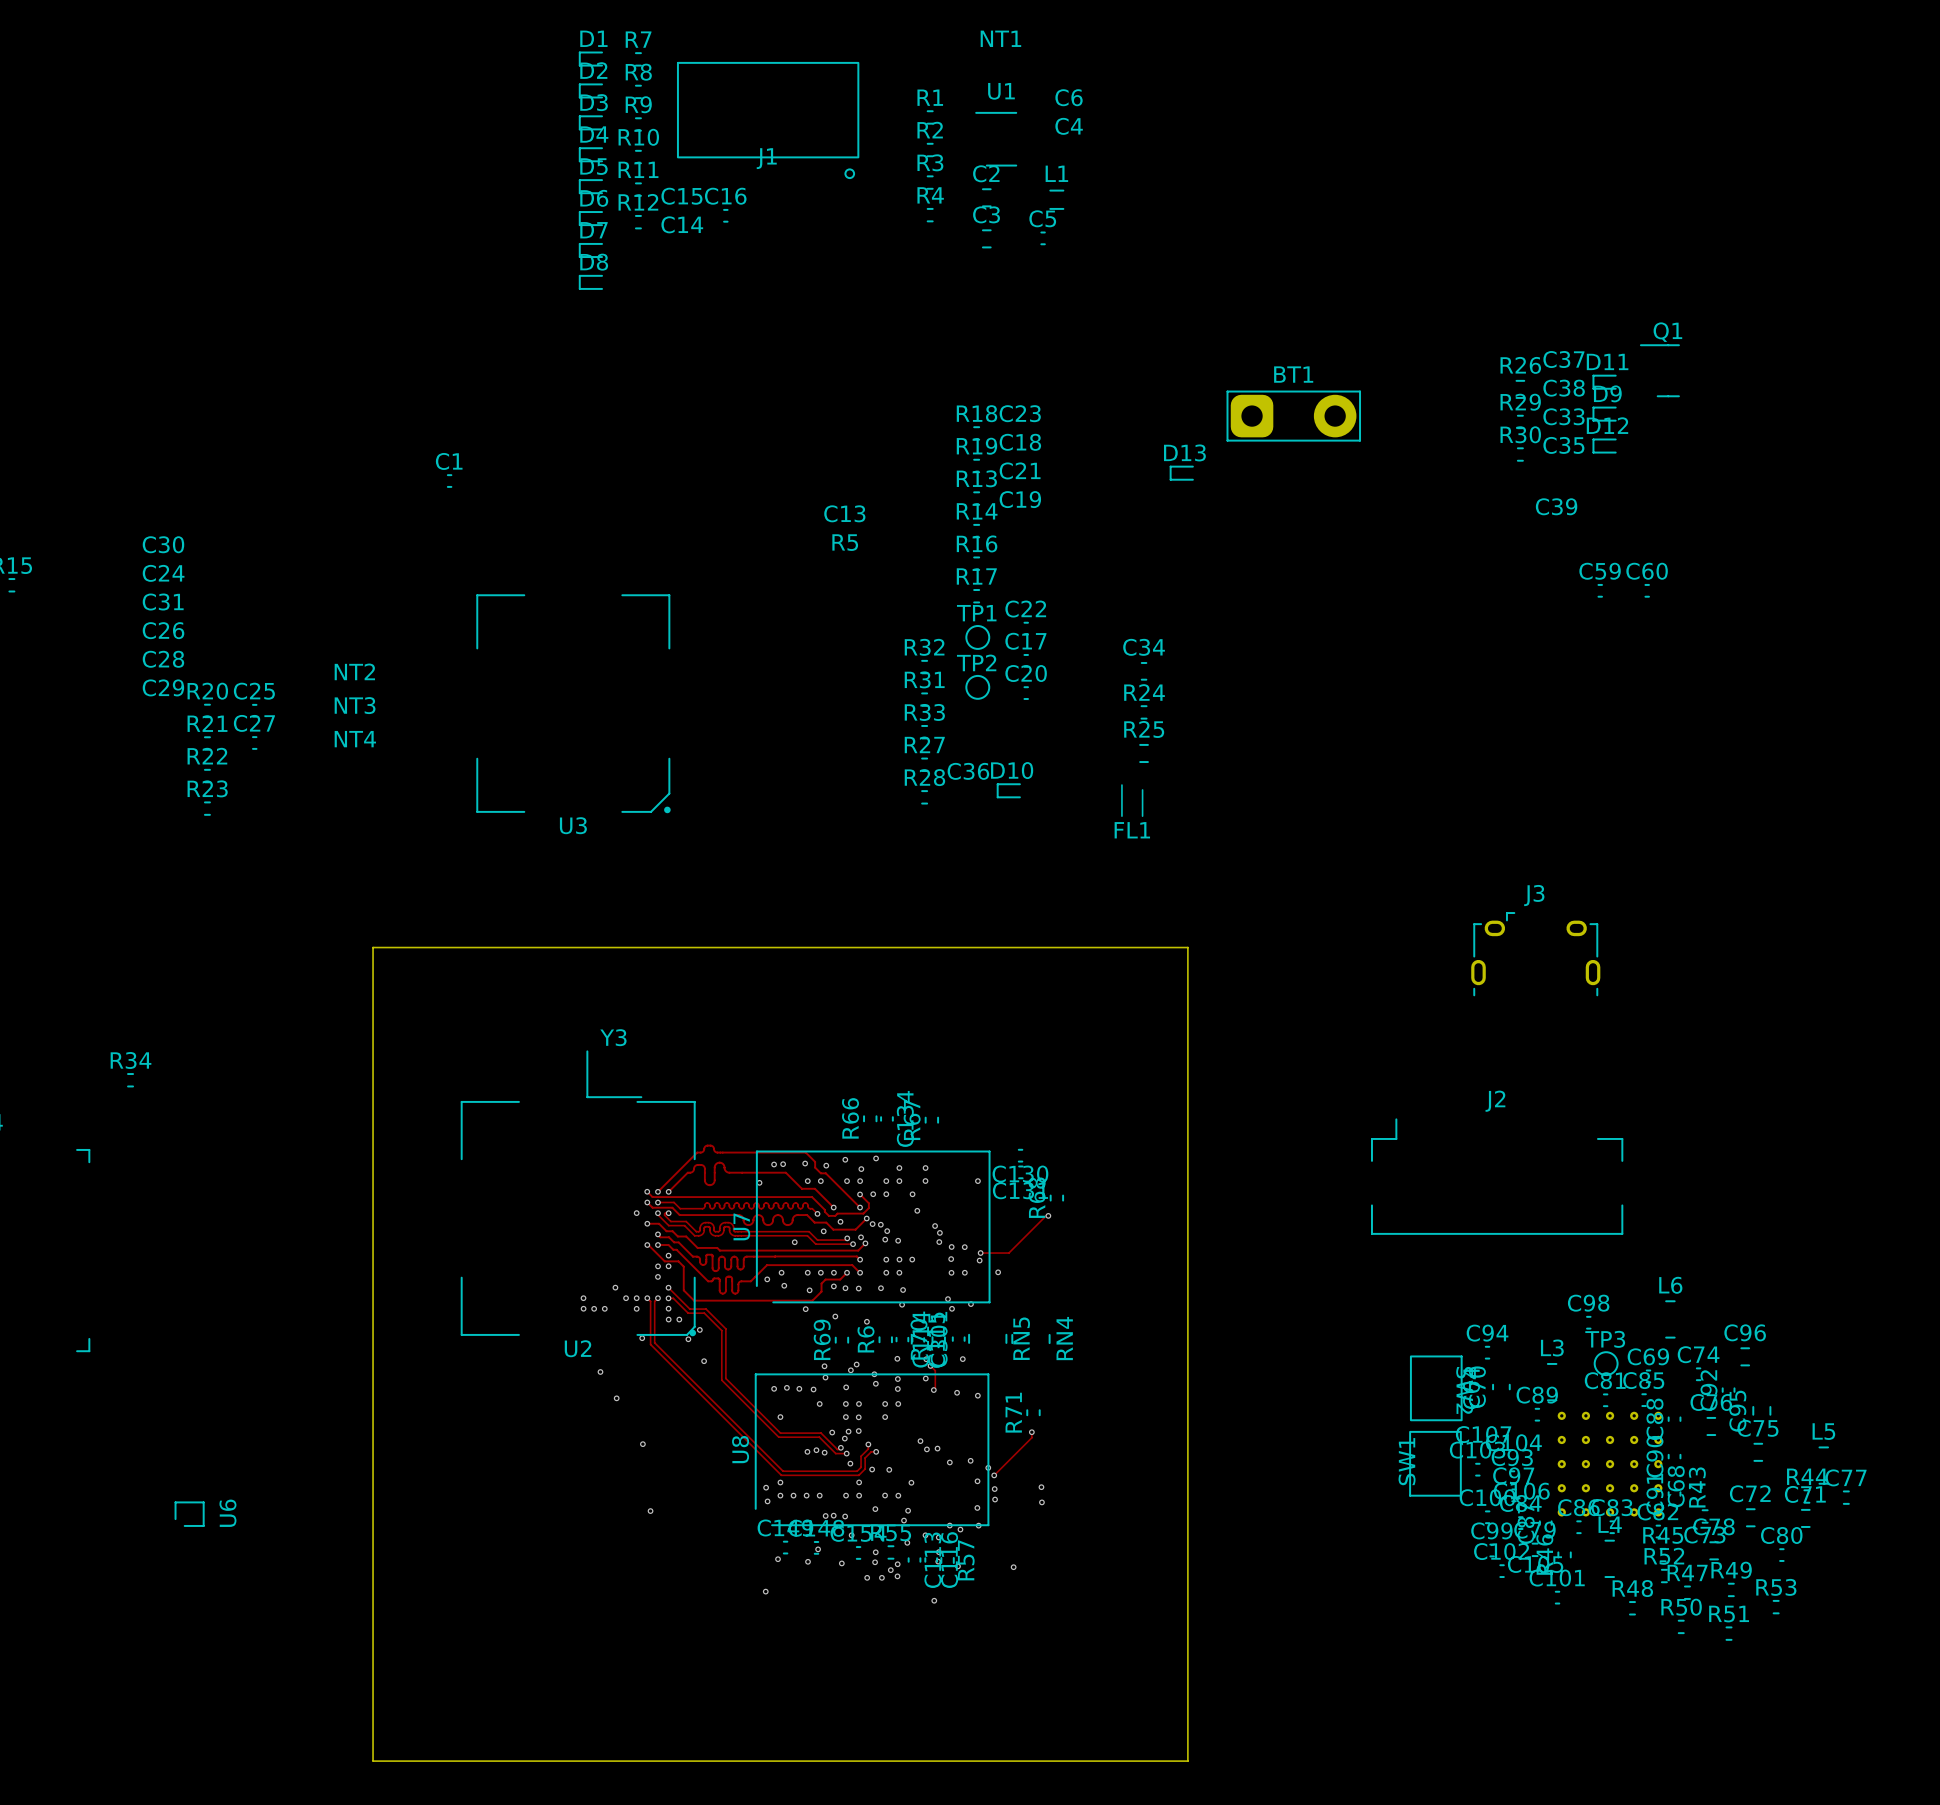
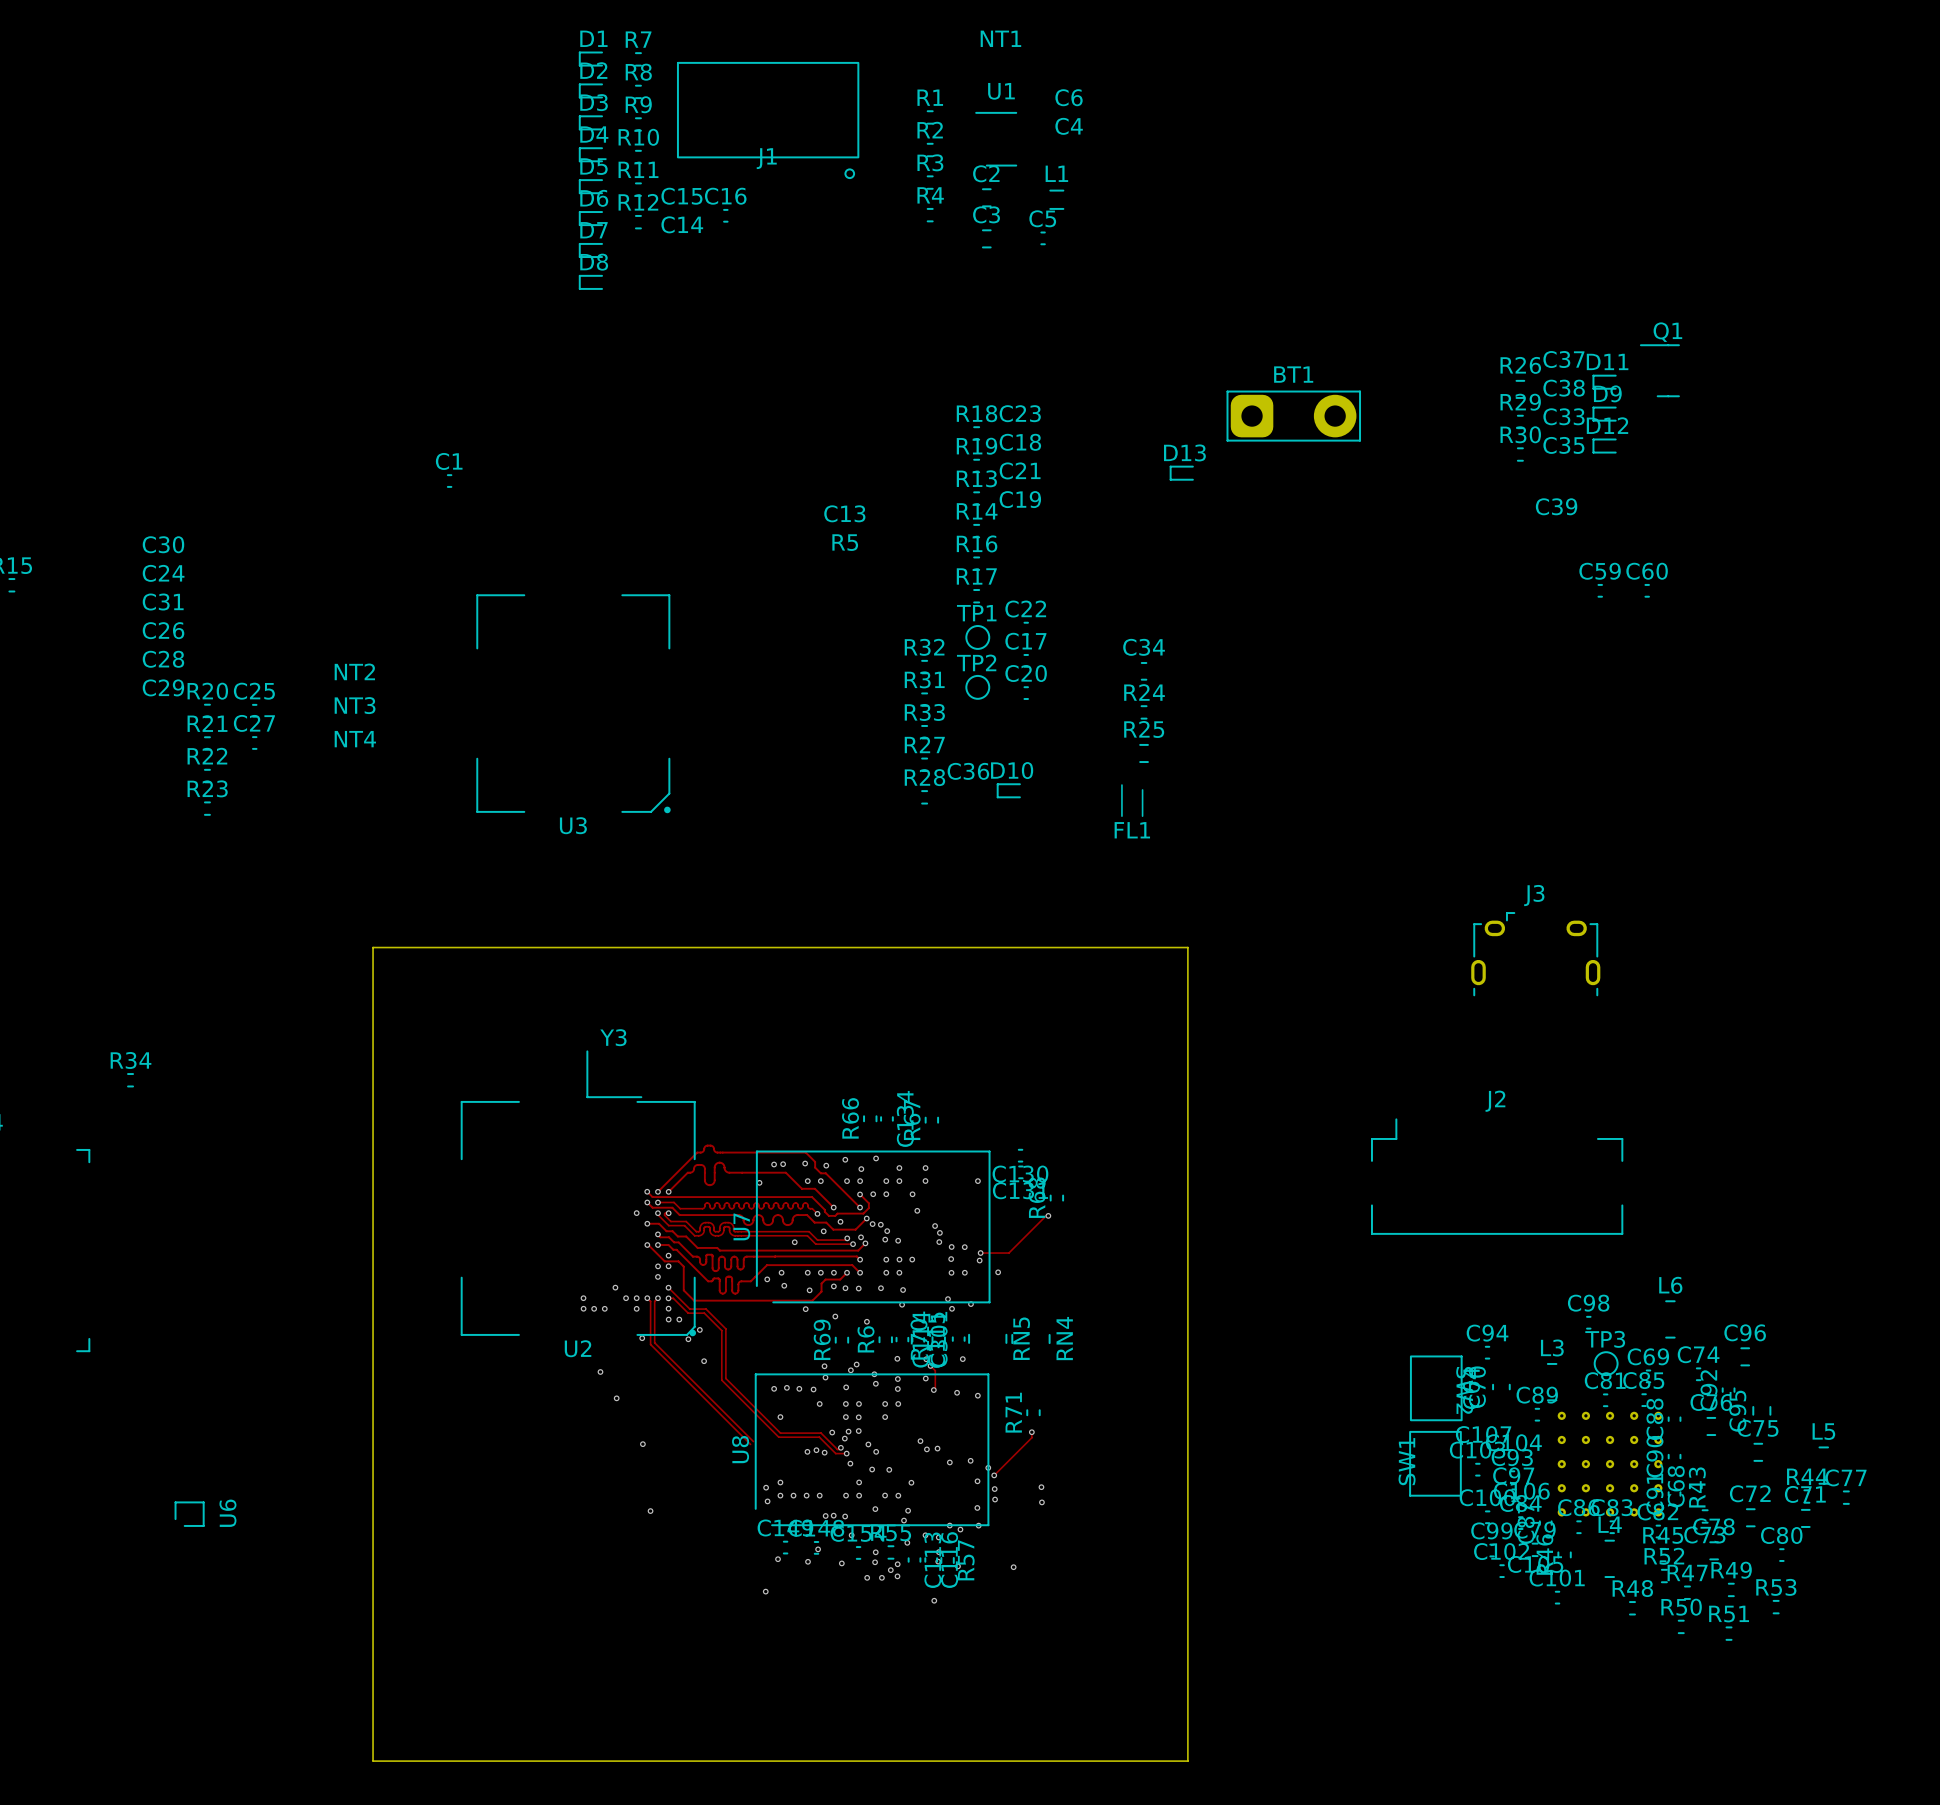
track: (753, 1441) (783, 1471) (857, 1471) (861, 1467) (861, 1456) (868, 1448) (868, 1444) -> none
track: (750, 1444) (781, 1475) (858, 1475) (865, 1469) (865, 1457) (871, 1451) (876, 1451) -> none

